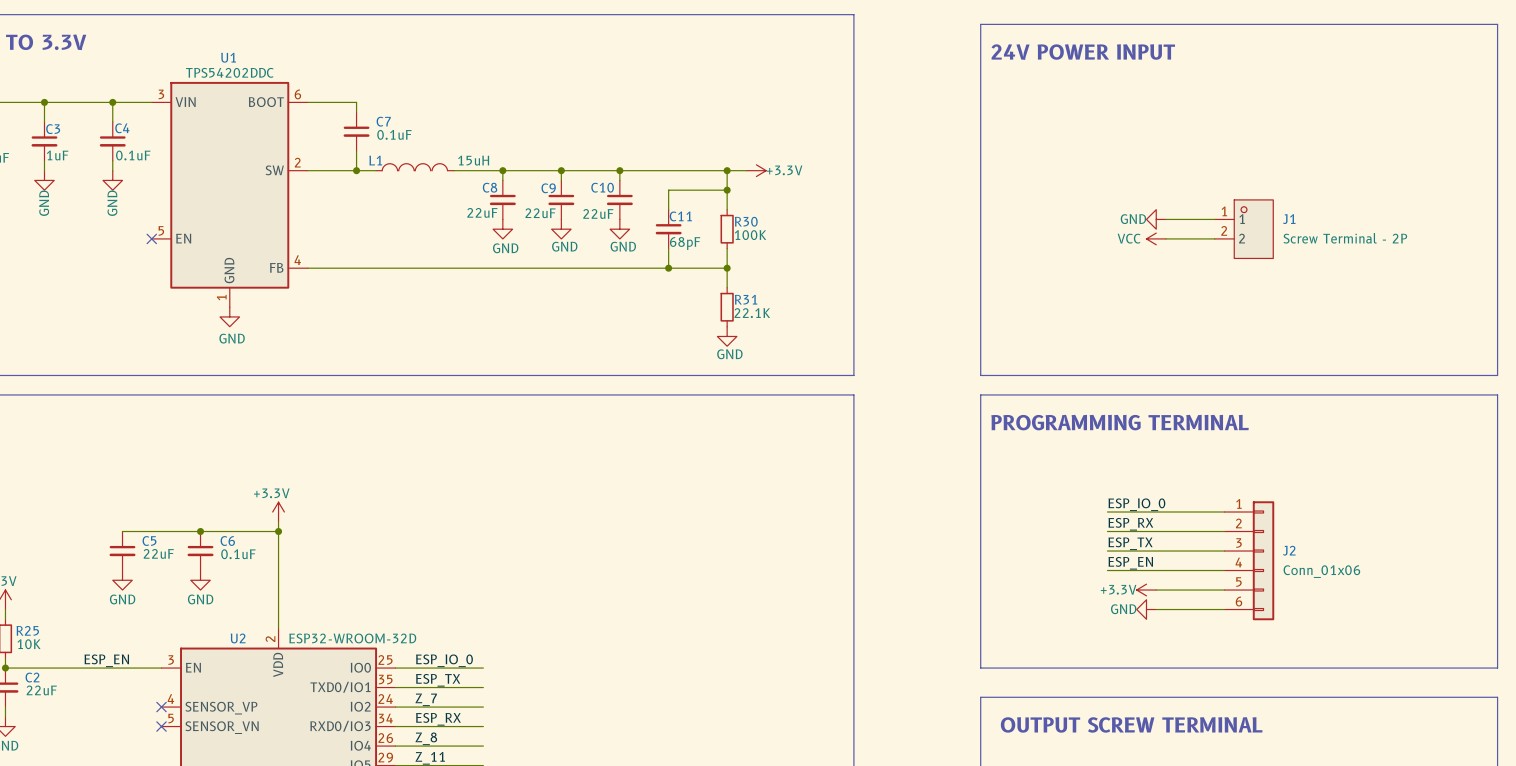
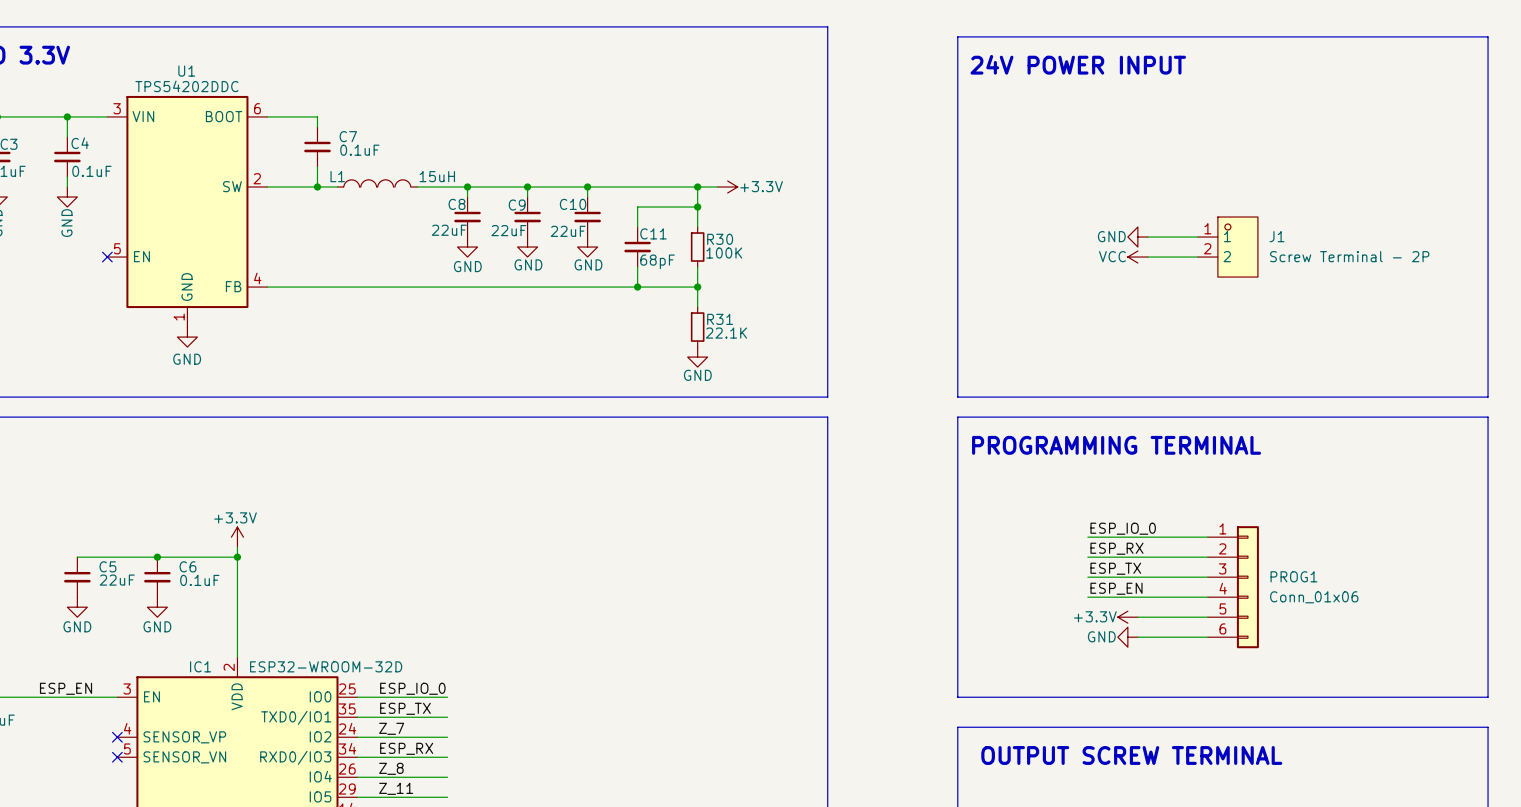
J2 name: J2 (1289, 550) -> PROG1 (1293, 576)
U2 name: U2 (238, 638) -> IC1 (200, 666)

